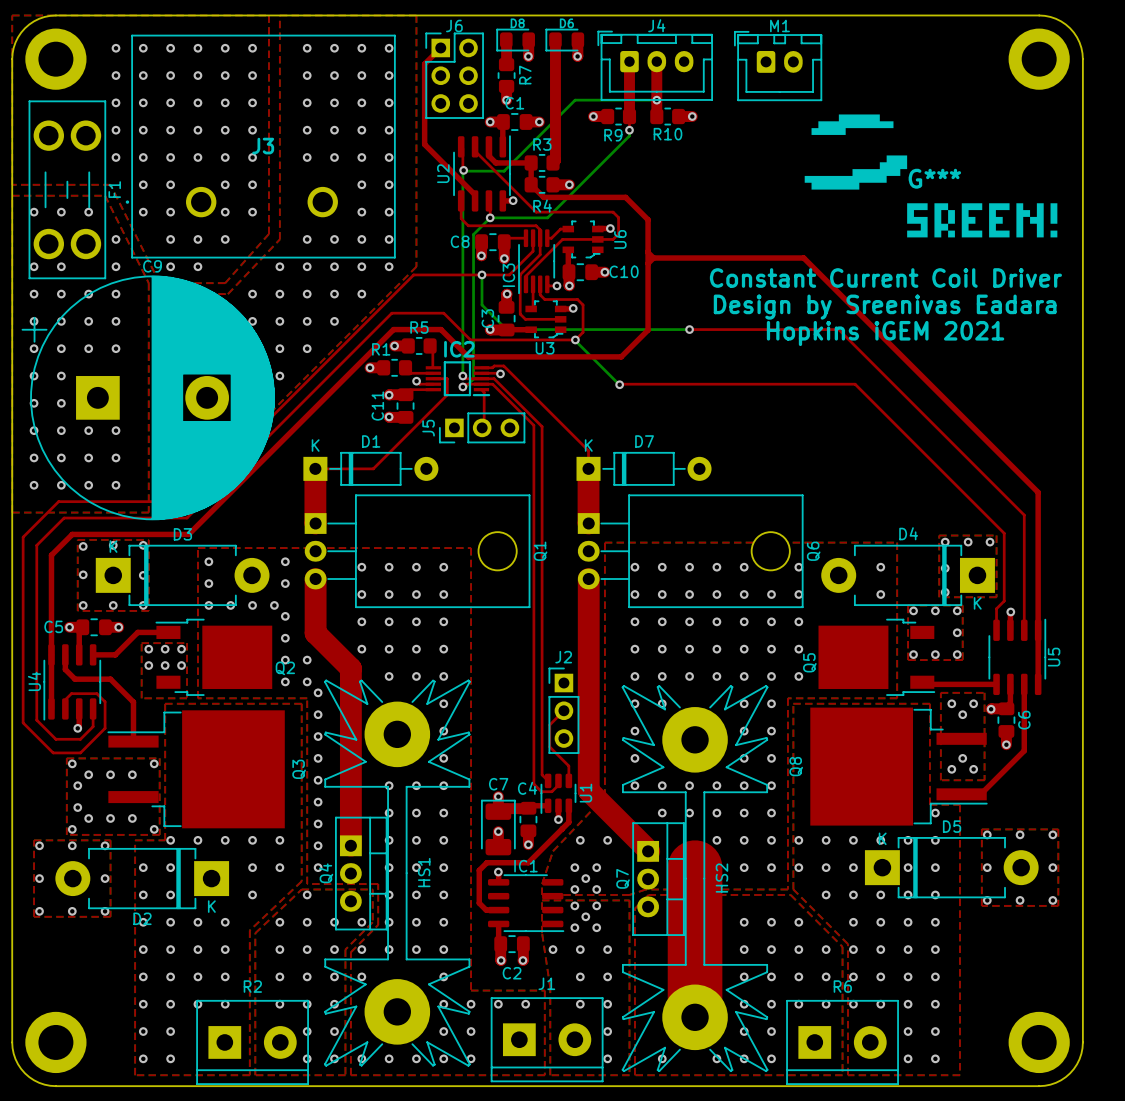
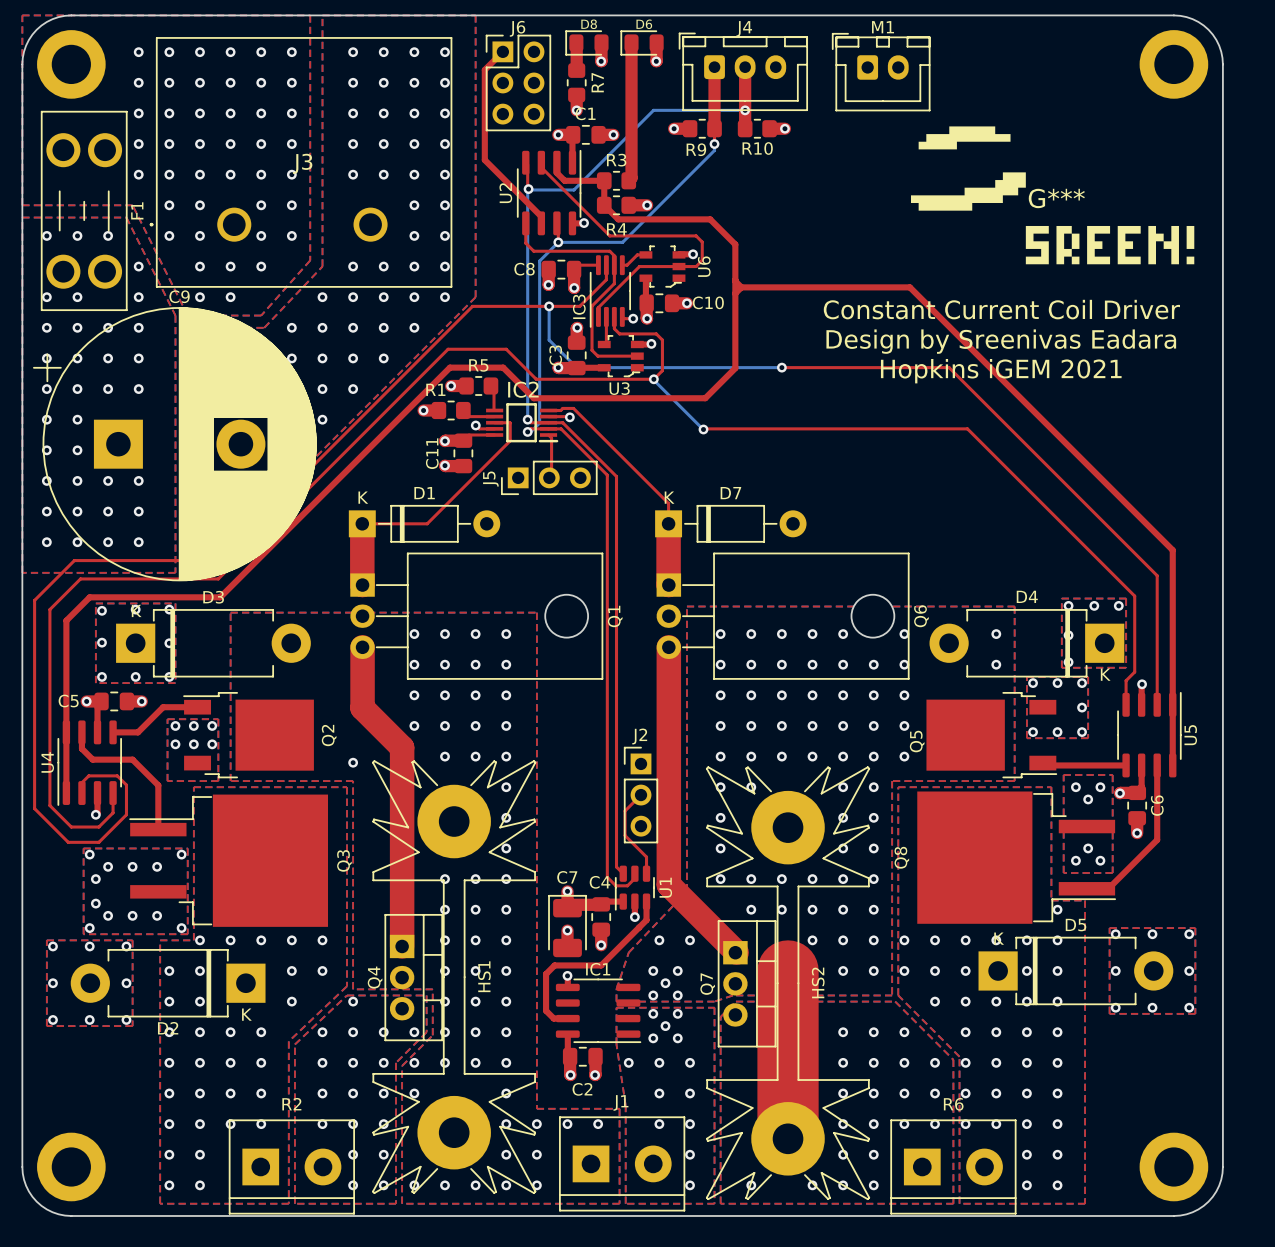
via: (208, 561) -> none
via: (285, 561) -> none
via: (208, 583) -> none
via: (285, 583) -> none
via: (208, 605) -> none
via: (230, 605) -> none
via: (252, 605) -> none
via: (274, 605) -> none
via: (285, 616) -> none
via: (285, 638) -> none
via: (285, 660) -> none
via: (307, 660) -> none
Q2 name rotation: 0° (285, 668) -> 90° counterclockwise (329, 735)
via: (285, 681) -> none
via: (318, 692) -> none
via: (318, 714) -> none
via: (318, 736) -> none
via: (318, 758) -> none
via: (318, 780) -> none
via: (318, 802) -> none
via: (318, 823) -> none
via: (318, 845) -> none
via: (318, 867) -> none

